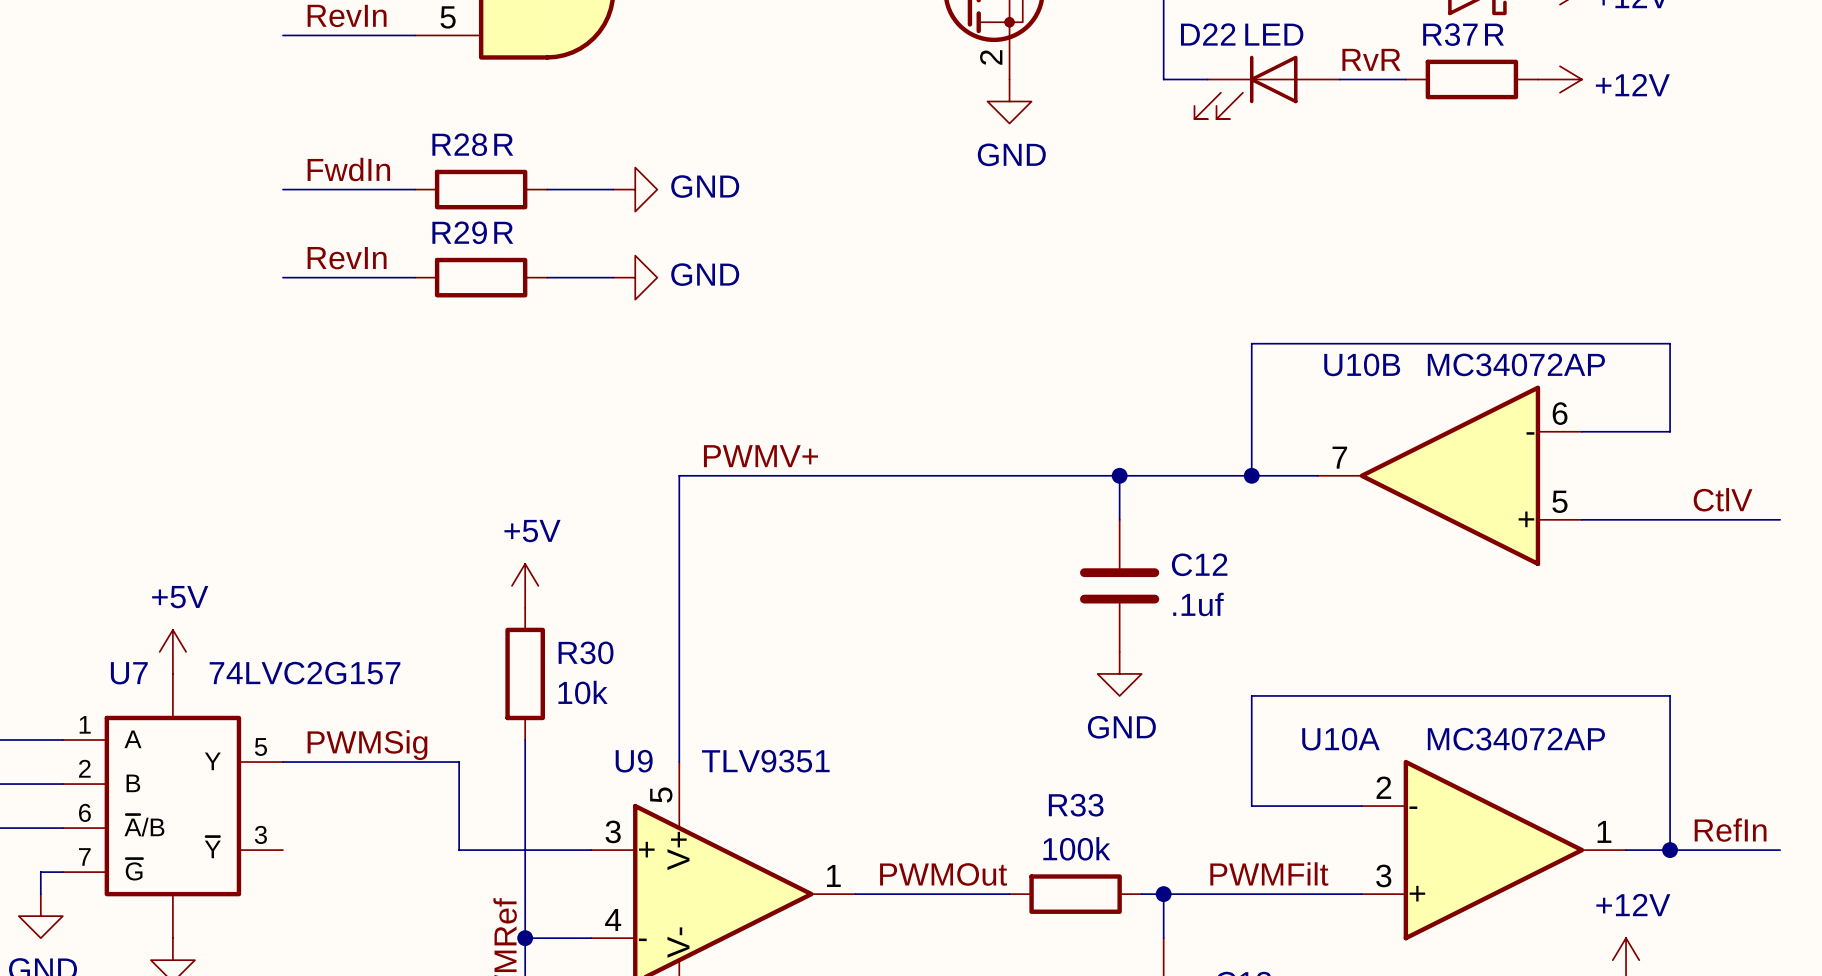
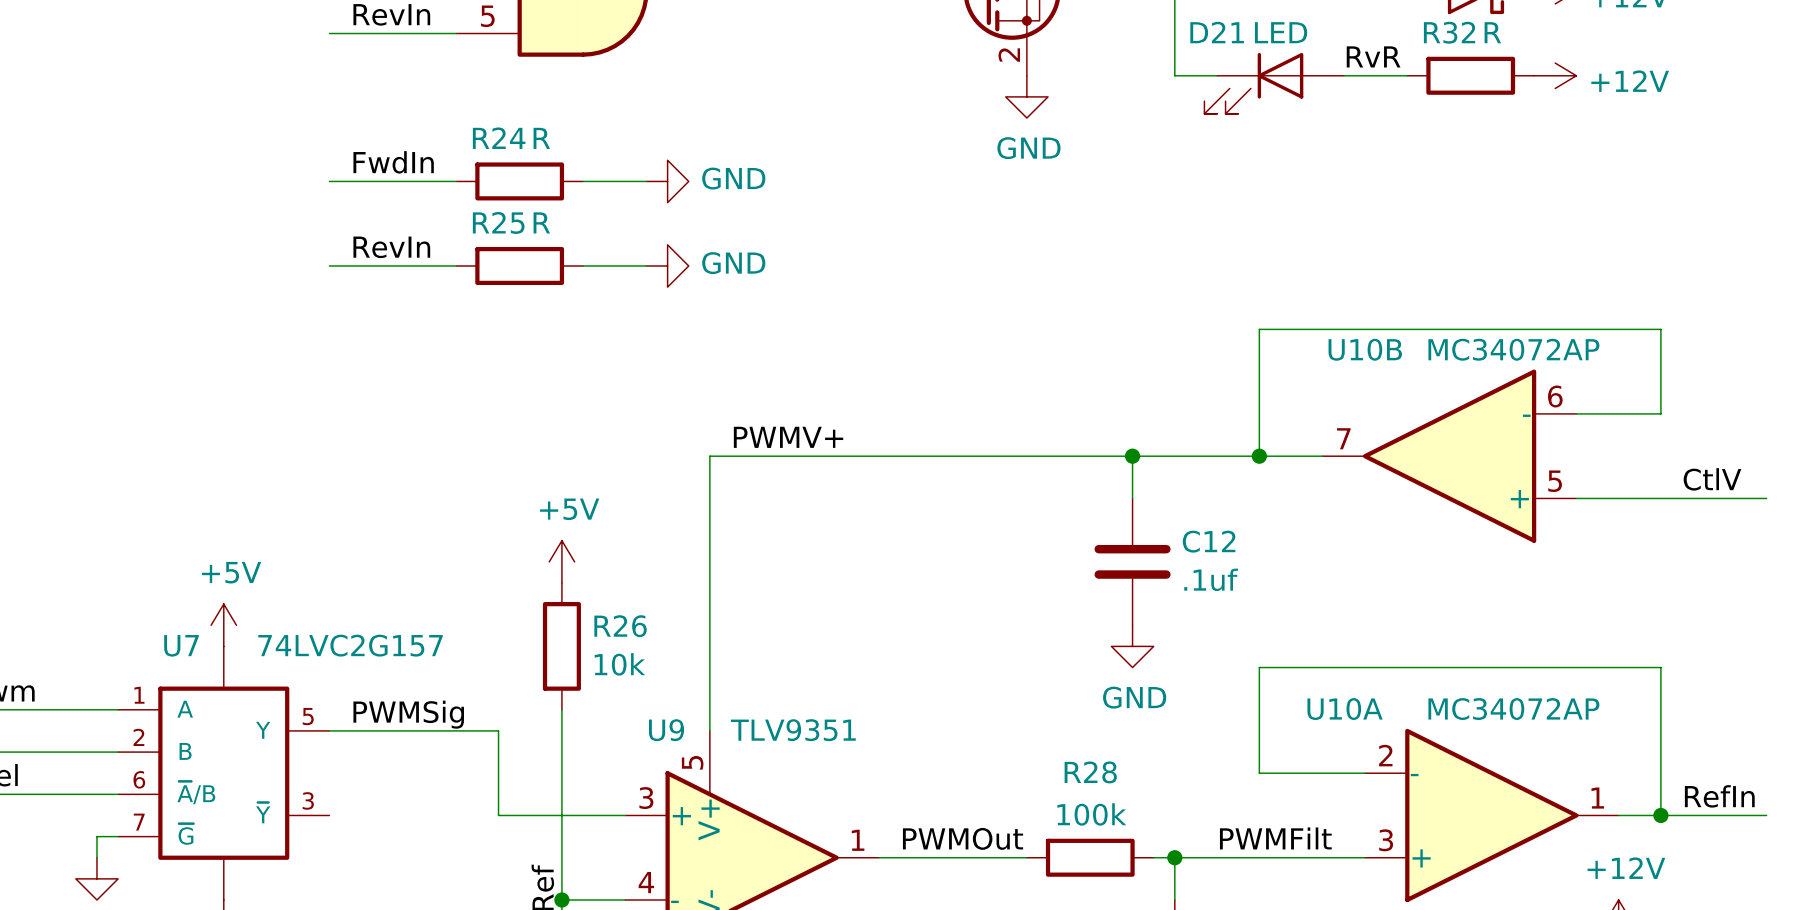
D22 name: D22 (1208, 34) -> D21 (1217, 32)
R37 name: R37 (1450, 34) -> R32 (1449, 32)
R28 name: R28 (459, 144) -> R24 (499, 138)
R29 name: R29 (459, 232) -> R25 (498, 222)
R30 name: R30 (586, 652) -> R26 (620, 626)
R33 name: R33 (1076, 805) -> R28 (1090, 772)

